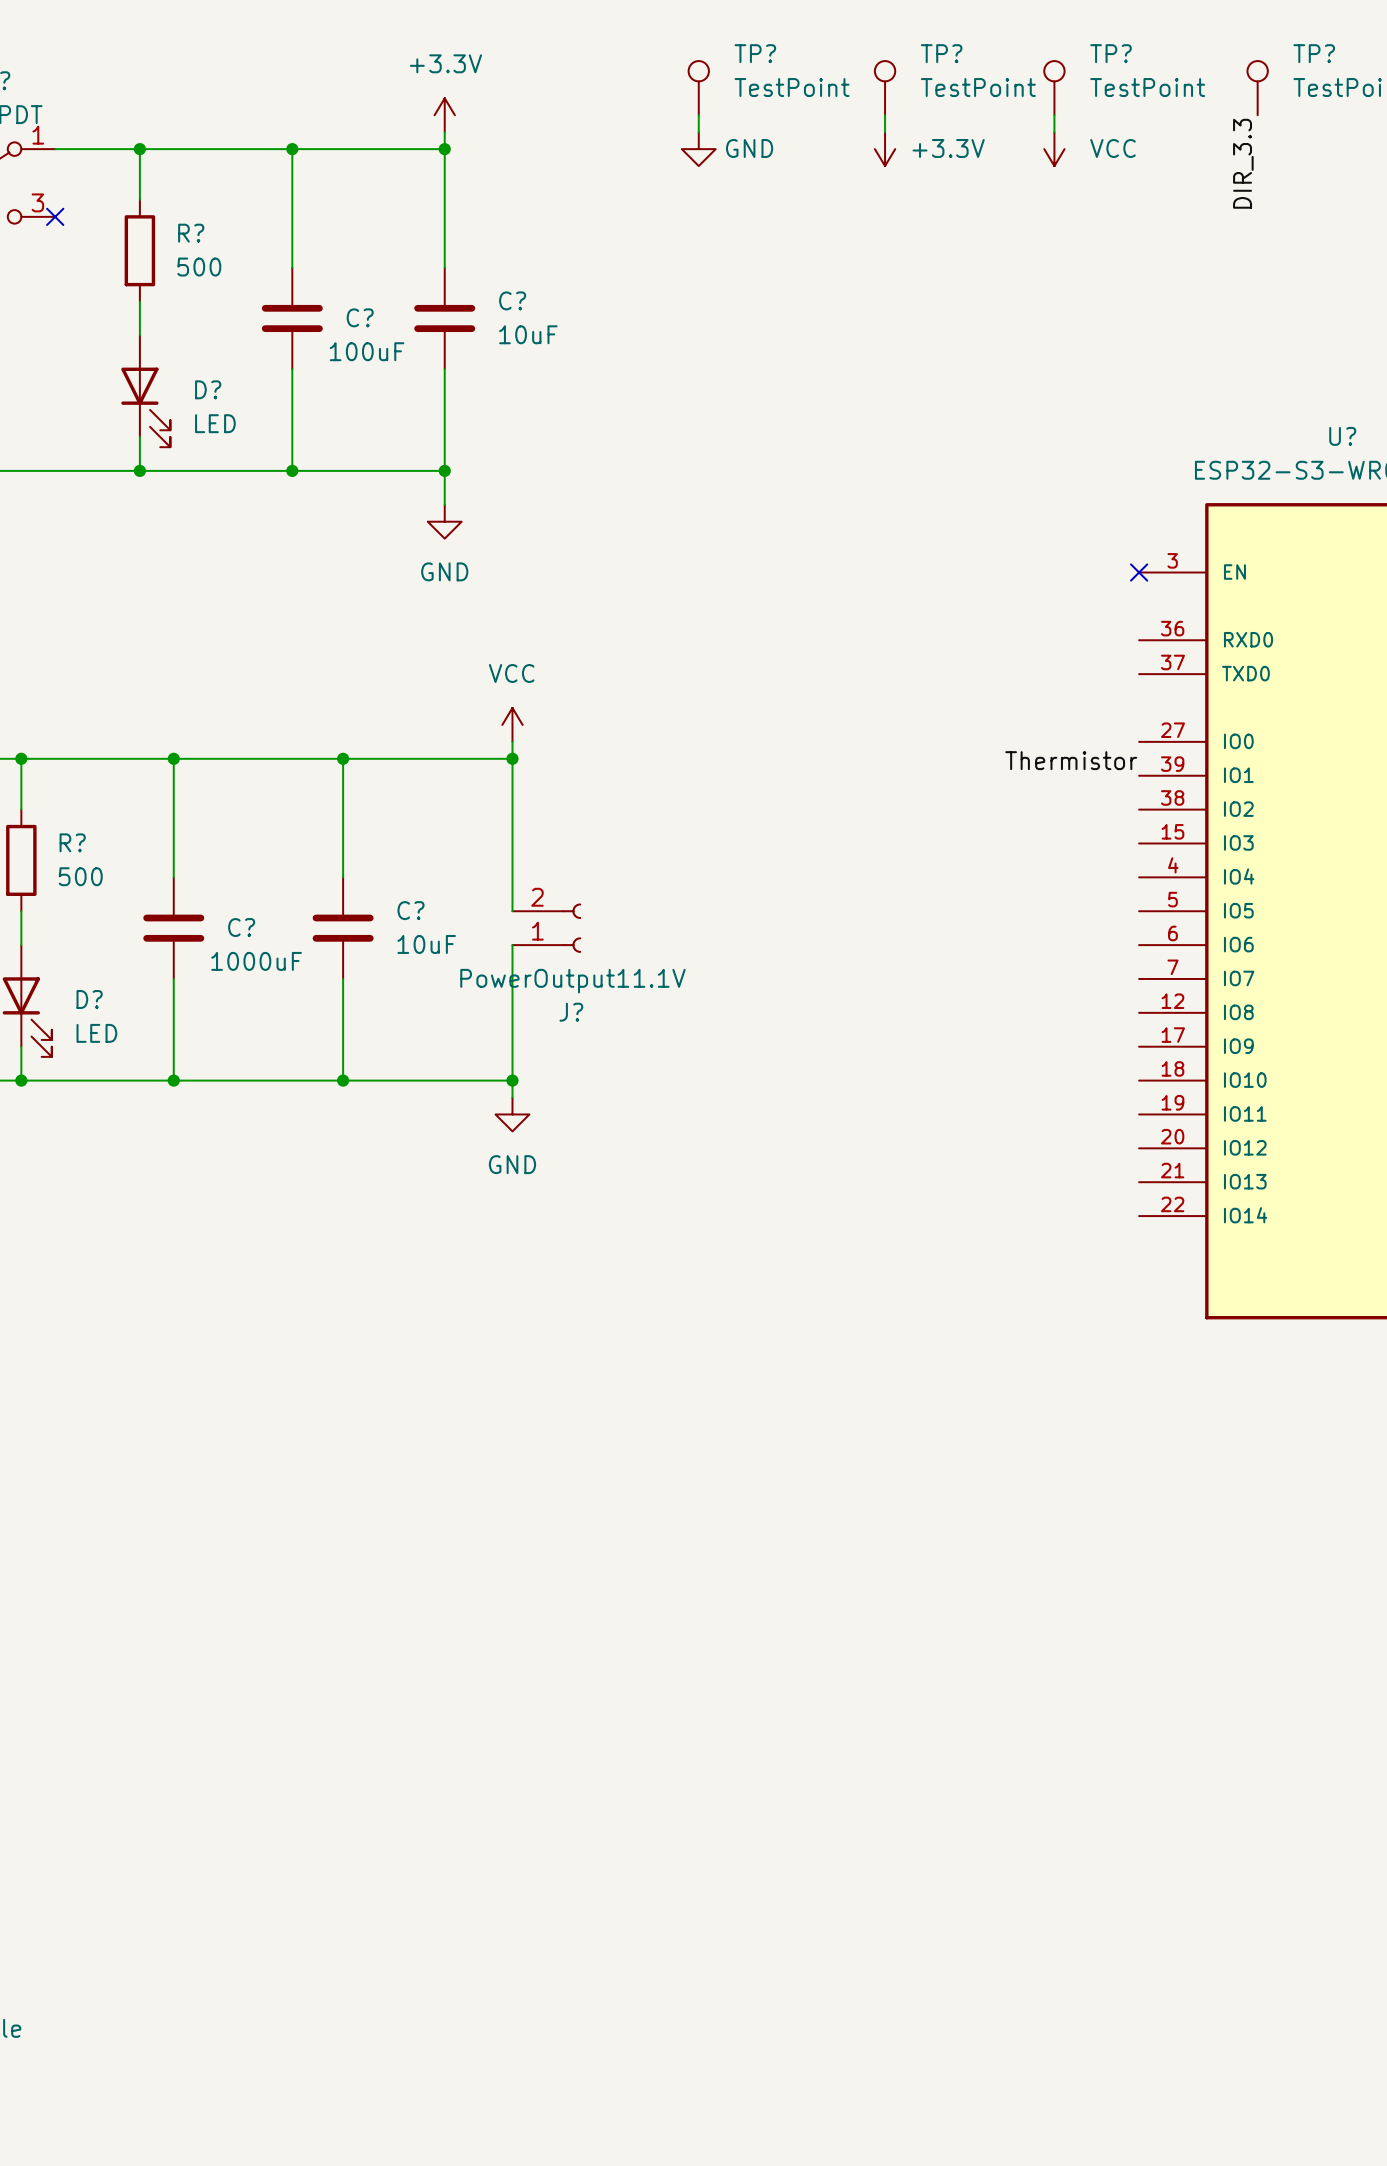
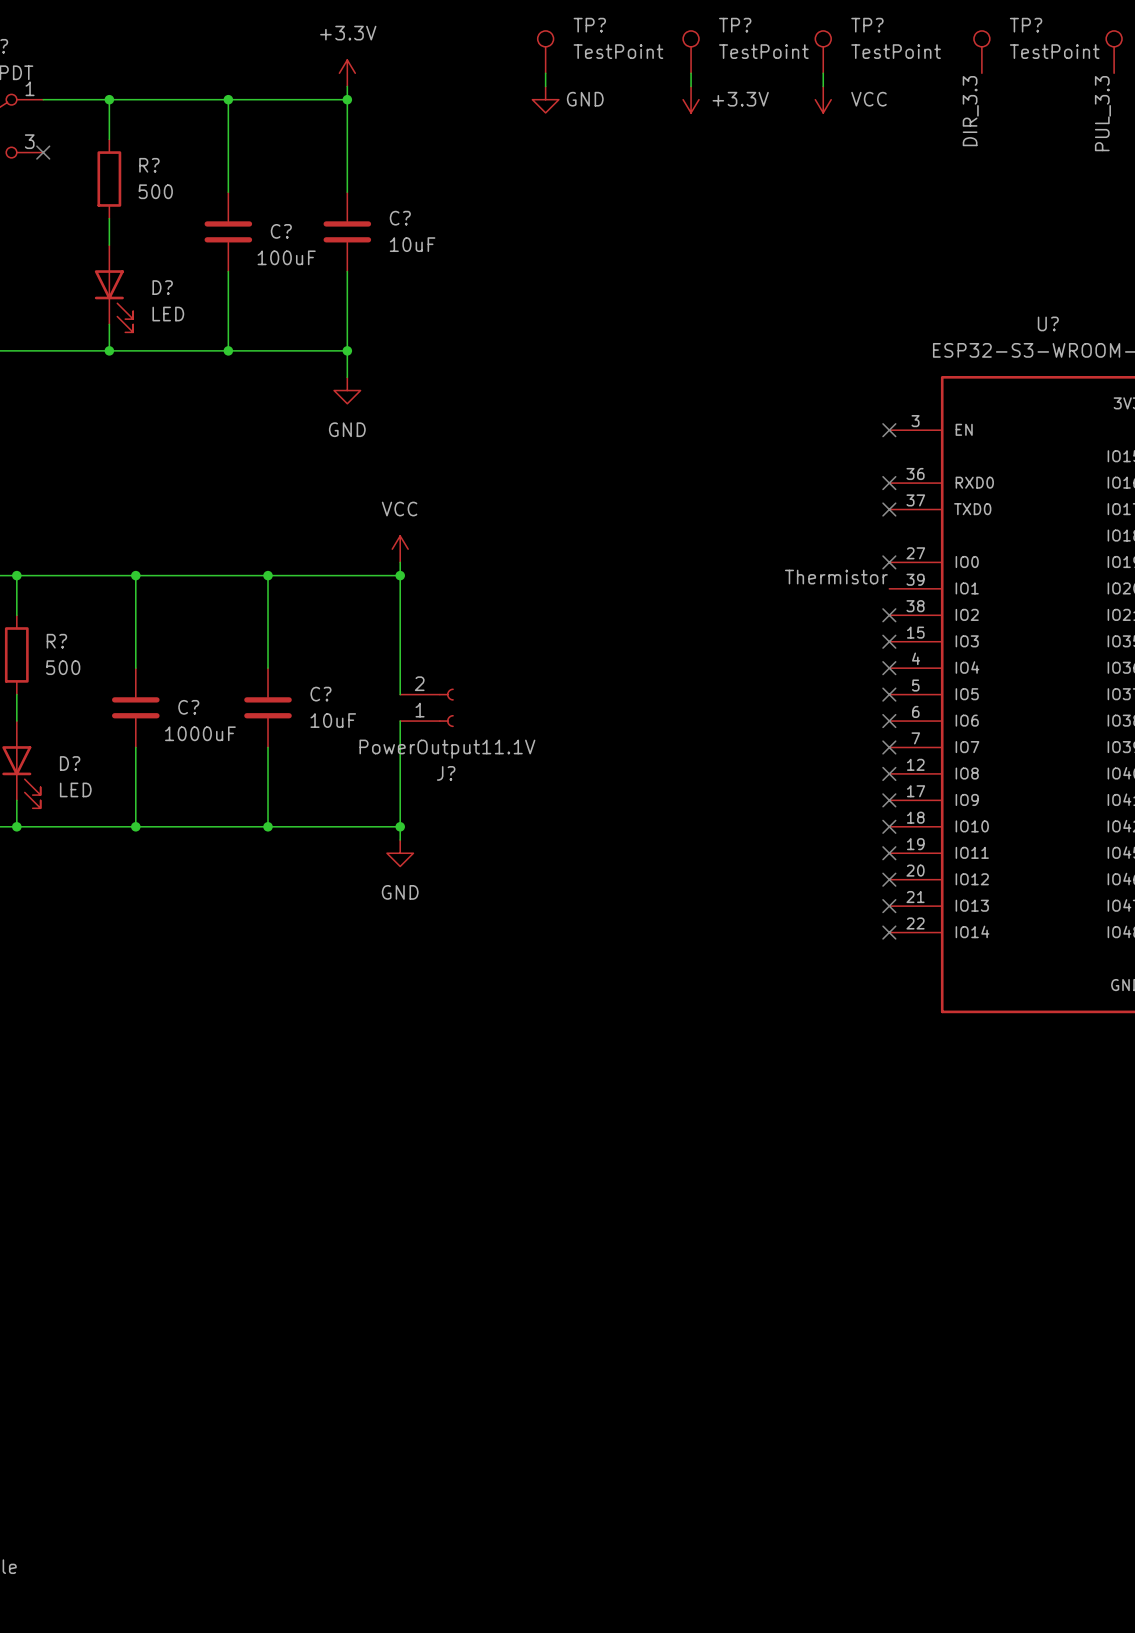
no-connect mark: none -> (889, 483)
no-connect mark: none -> (889, 509)
no-connect mark: none -> (889, 562)
no-connect mark: none -> (889, 615)
no-connect mark: none -> (889, 641)
no-connect mark: none -> (889, 668)
no-connect mark: none -> (889, 694)
no-connect mark: none -> (889, 721)
no-connect mark: none -> (889, 747)
no-connect mark: none -> (889, 773)
no-connect mark: none -> (889, 800)
no-connect mark: none -> (889, 826)
no-connect mark: none -> (889, 853)
no-connect mark: none -> (889, 879)
no-connect mark: none -> (889, 906)
no-connect mark: none -> (889, 932)

